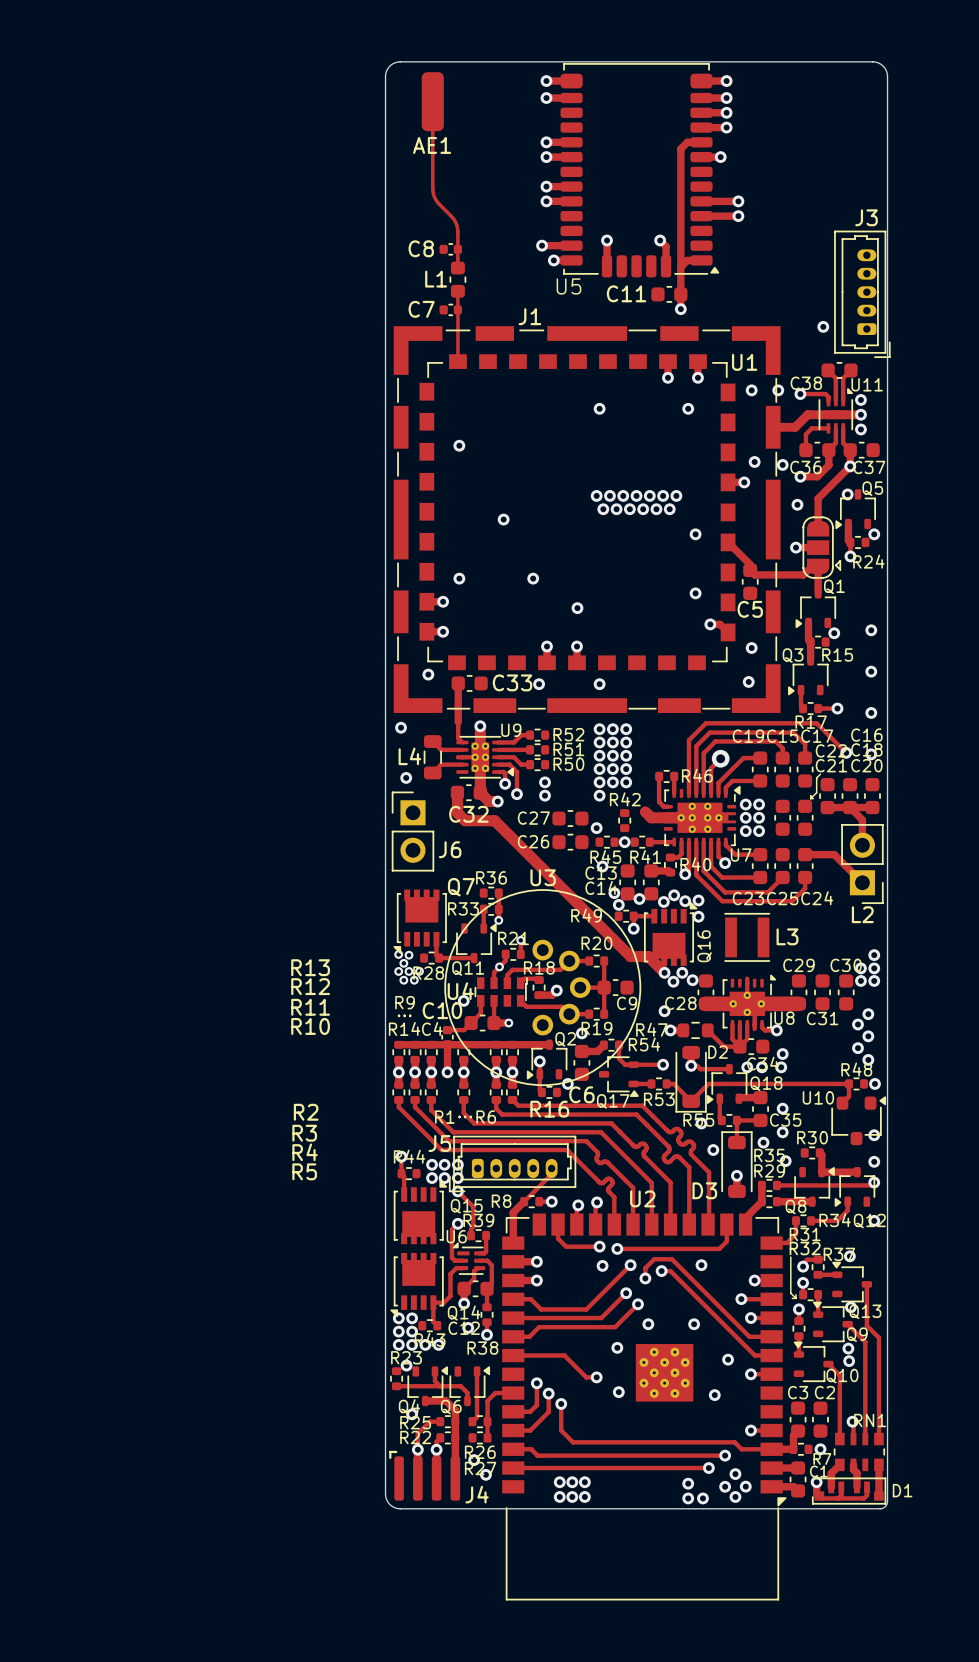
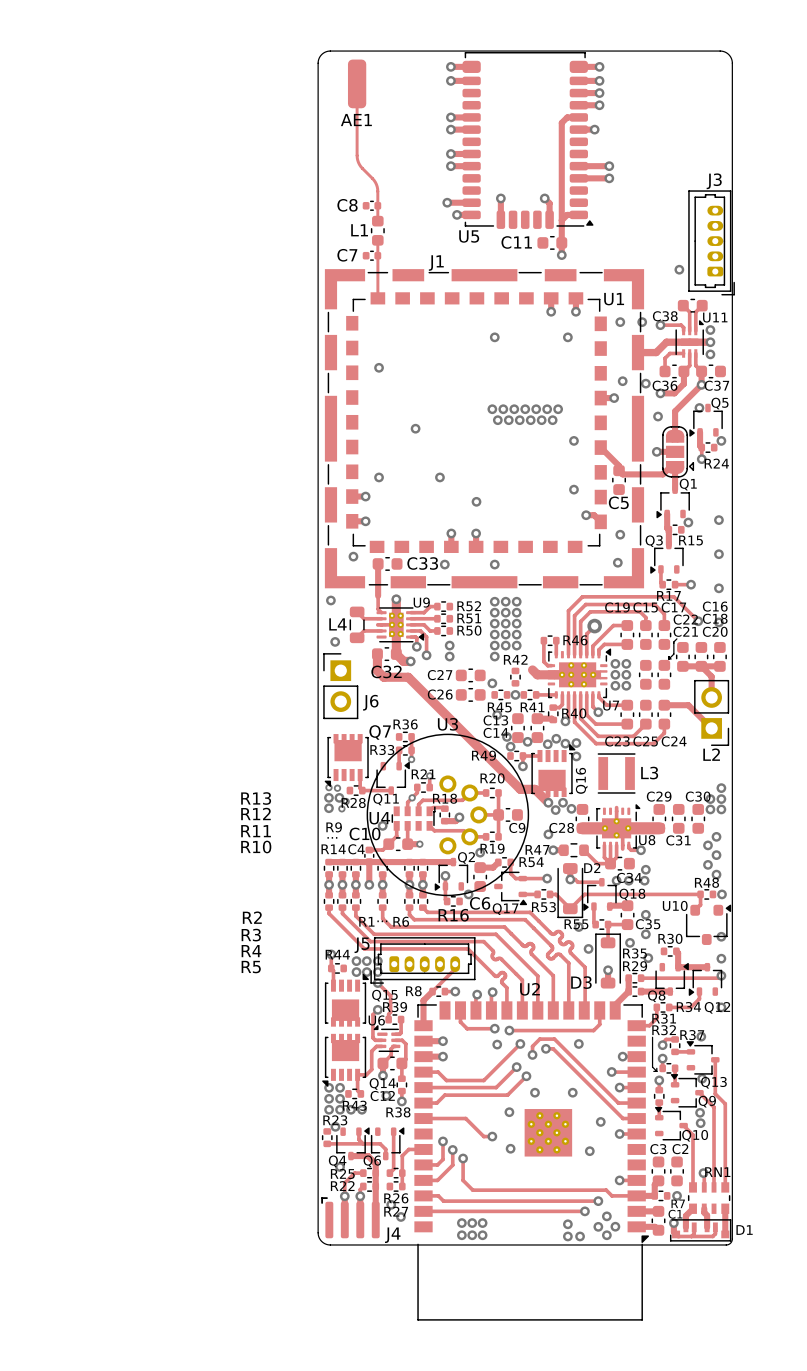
via: (403, 963) -> none
via: none -> (328, 797)
via: none -> (339, 797)
via: (398, 971) -> none
via: (409, 971) -> none
via: none -> (328, 808)
via: (403, 980) -> none

